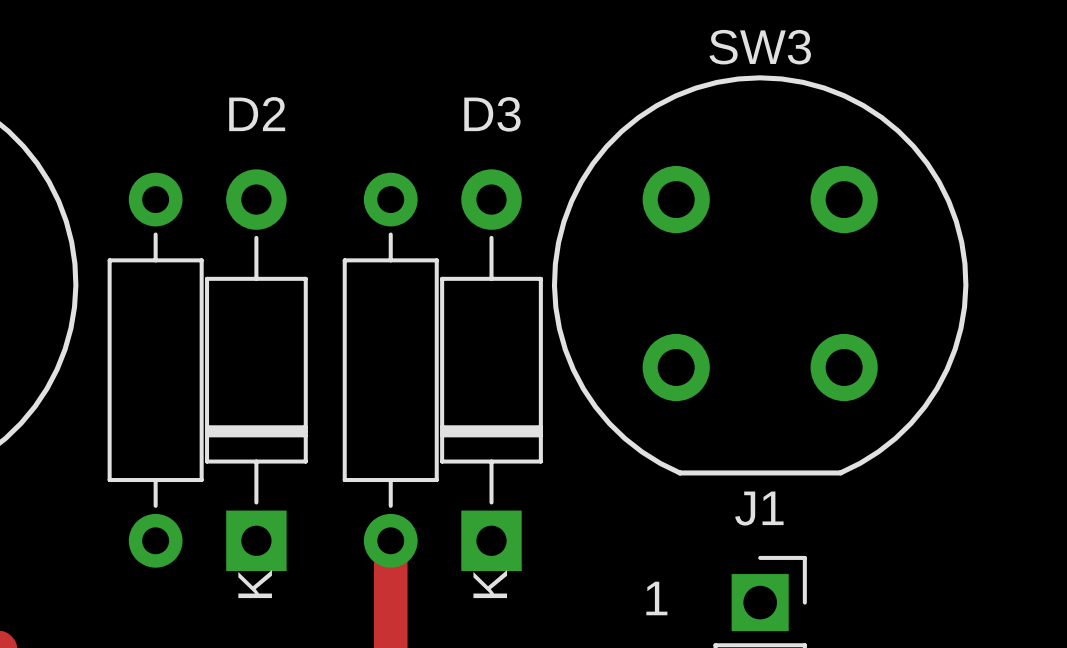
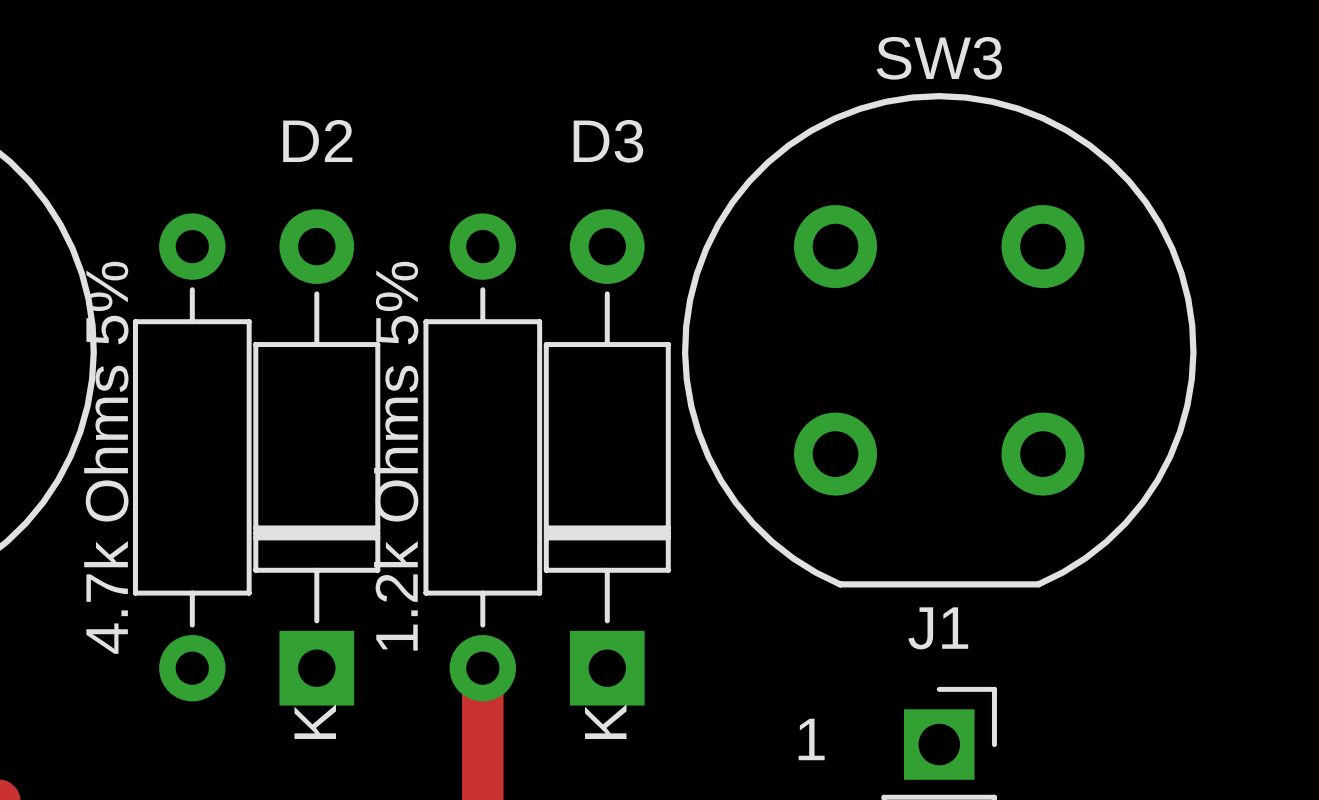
part value: none -> 1.2k Ohms 5% (396, 456)
part value: none -> 4.7k Ohms 5% (106, 457)

